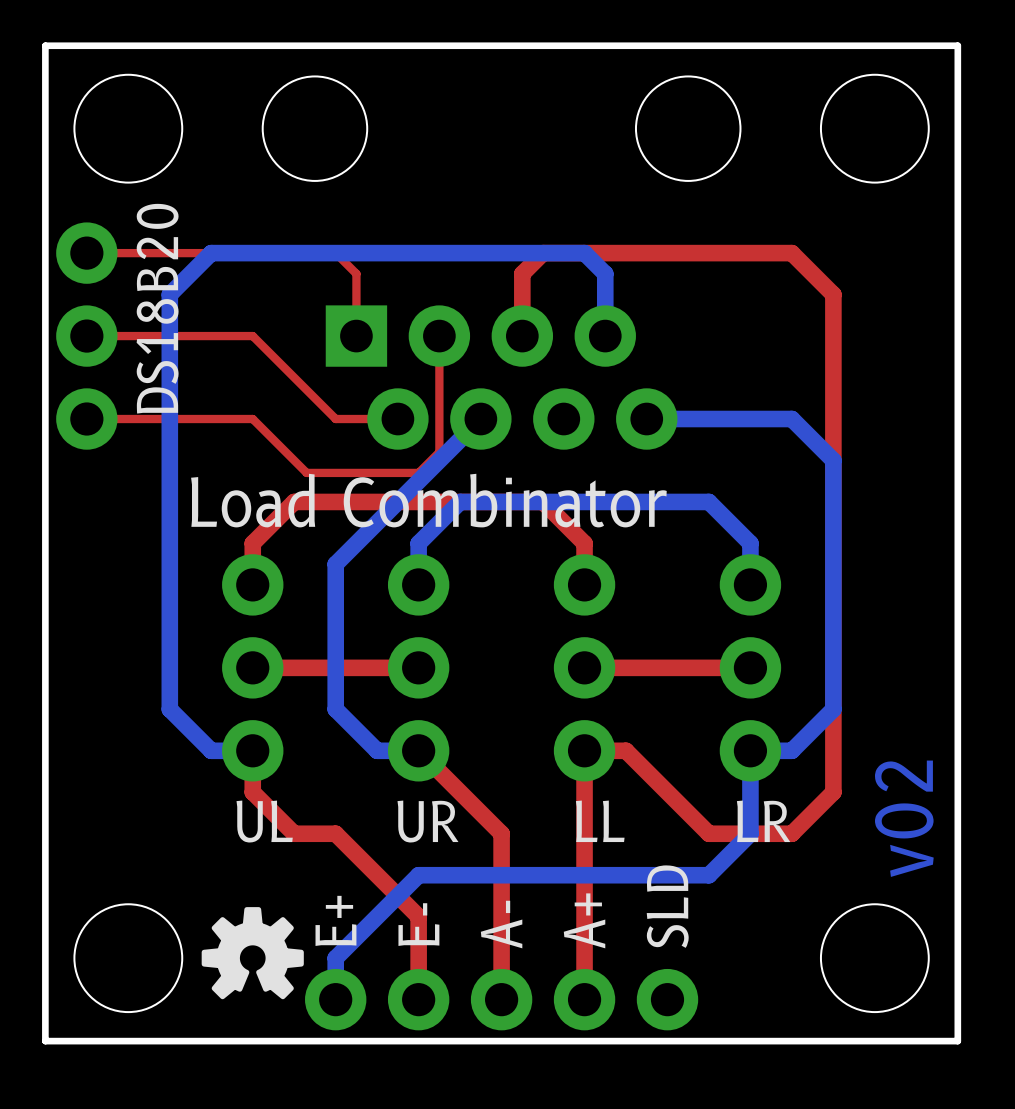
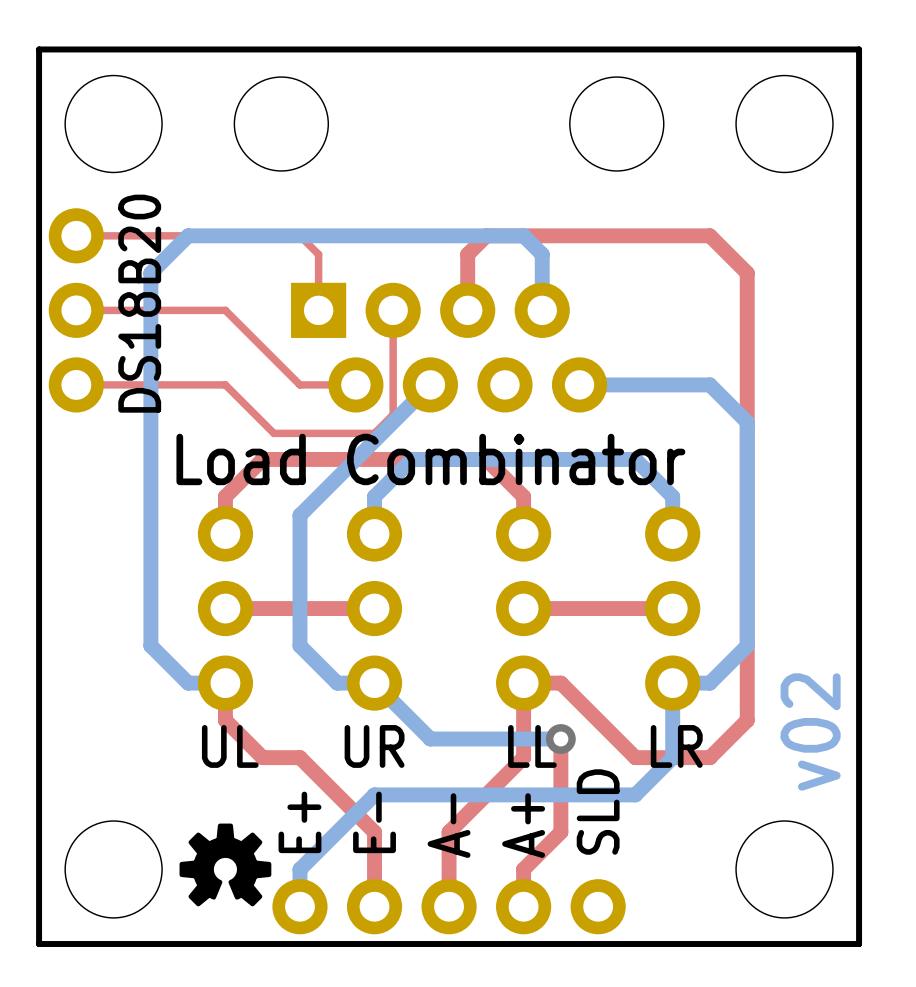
bottom track: none -> (374, 683) (430, 739) (560, 739)
top track: (418, 750) (501, 833) (501, 916) -> (523, 757) (449, 832)
via: none -> (560, 739)
top track: (584, 833) (584, 958) -> (560, 739) (560, 832) (523, 869)

